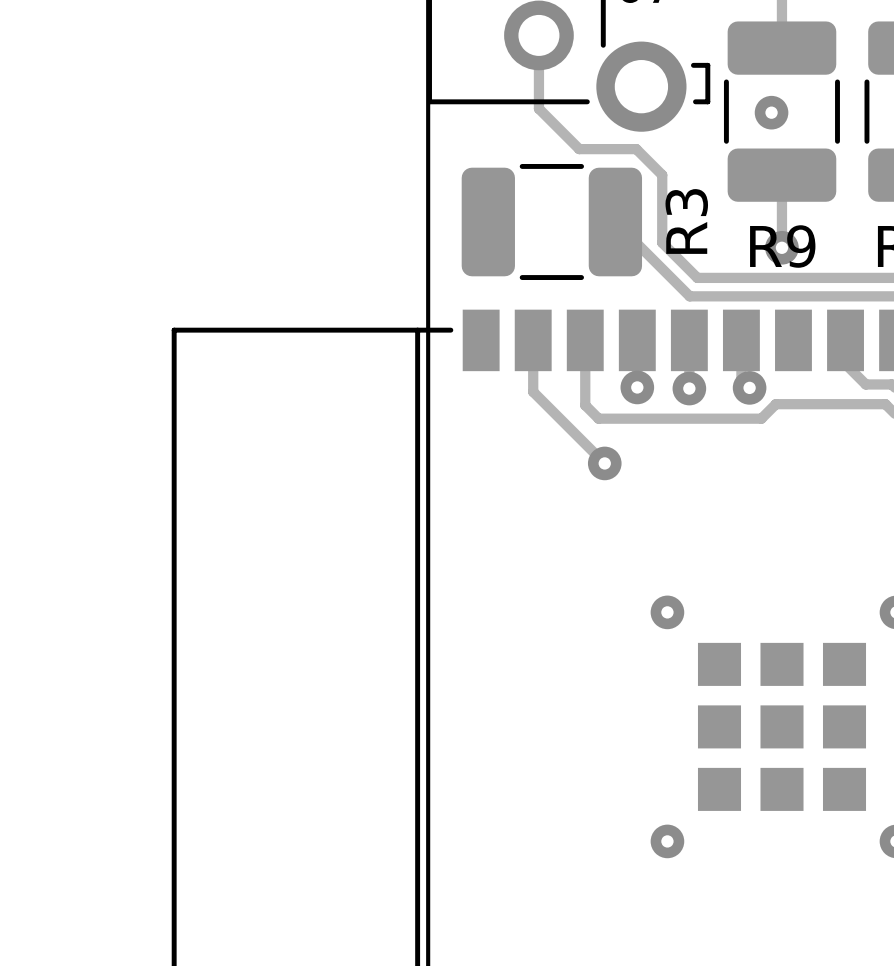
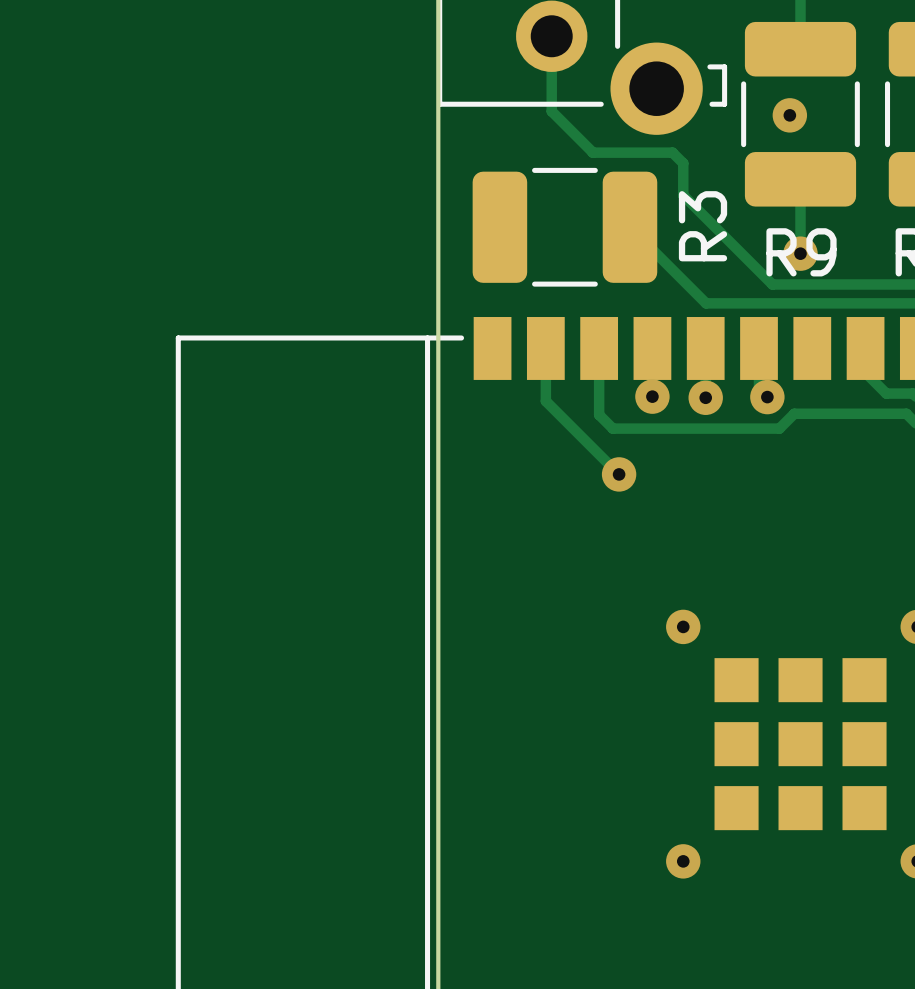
track: (636, 149) (662, 175) (662, 242) (697, 277) (754, 277) -> (651, 152) (672, 152) (683, 163) (683, 195) (772, 284)

